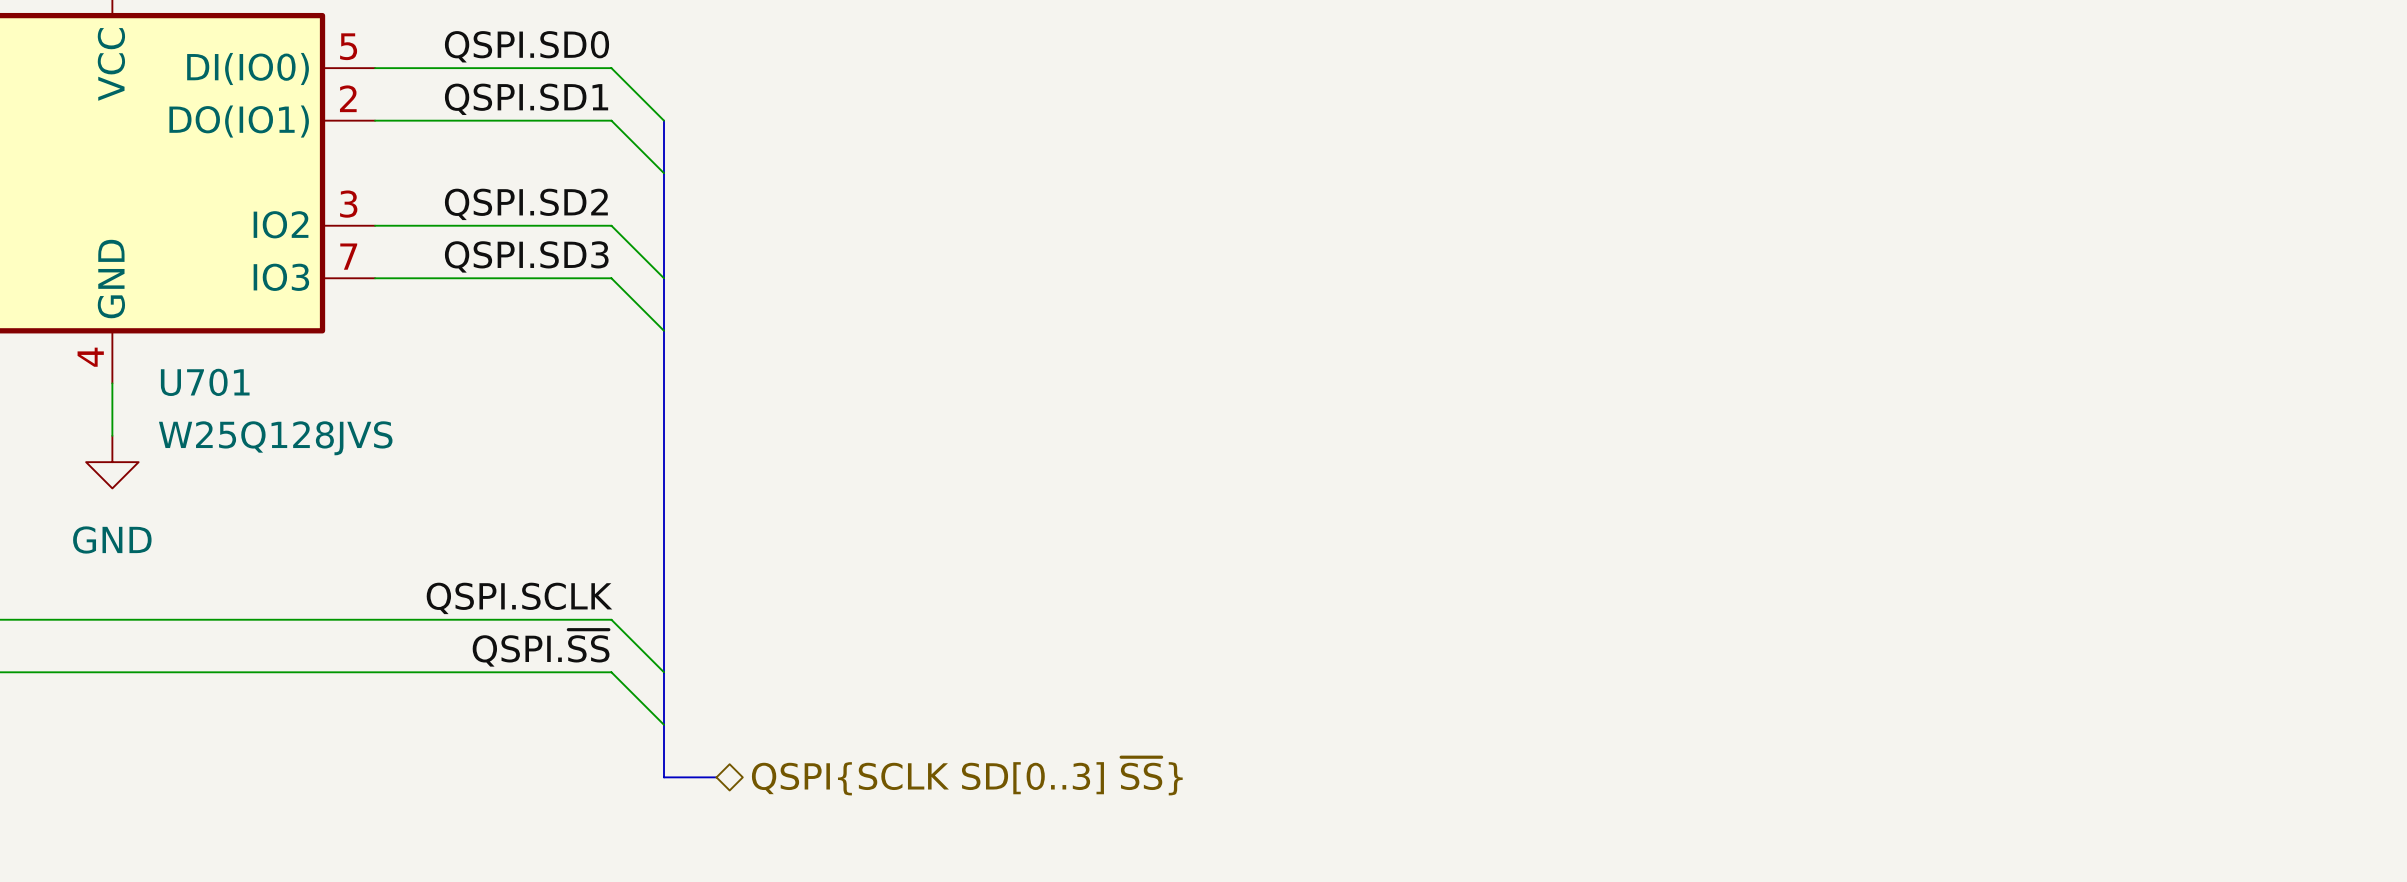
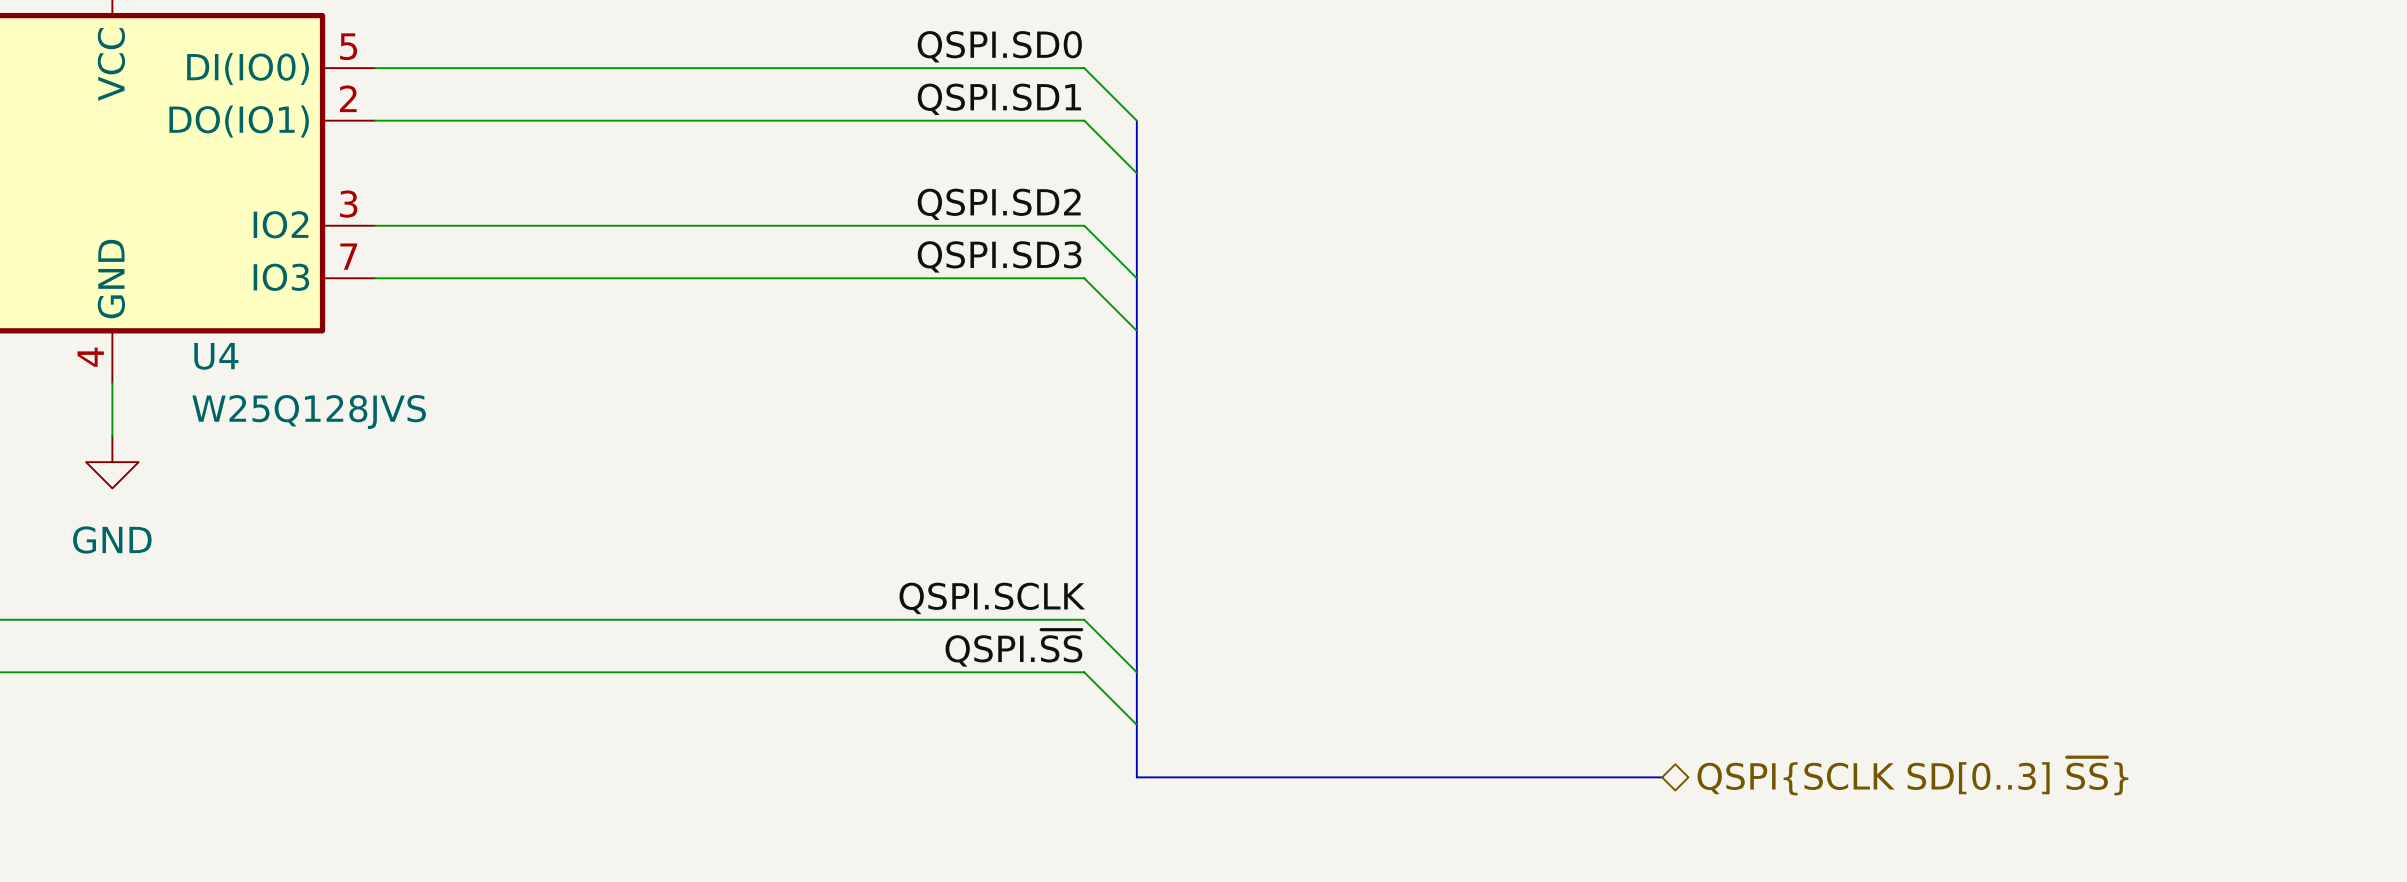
label position: QSPI.SD0 (526, 46) -> QSPI.SD0 (999, 46)
wire: (611, 68) (664, 120) -> (611, 68) (1084, 68) (1136, 120)
label position: QSPI.SD1 (526, 99) -> QSPI.SD1 (999, 99)
wire: (611, 120) (664, 173) -> (611, 120) (1084, 120) (1136, 173)
bus: (664, 120) (664, 777) (716, 777) -> none
bus: none -> (1136, 120) (1136, 777) (1662, 777)
label position: QSPI.SD2 (526, 204) -> QSPI.SD2 (999, 204)
wire: (611, 225) (664, 278) -> (611, 225) (1084, 225) (1136, 278)
label position: QSPI.SD3 (526, 256) -> QSPI.SD3 (999, 256)
wire: (611, 278) (664, 330) -> (611, 278) (1084, 278) (1136, 330)
U701 name: U701 (205, 382) -> U4 (216, 356)
U701 value position: W25Q128JVS (275, 438) -> W25Q128JVS (309, 412)
label position: QSPI.SCLK (519, 598) -> QSPI.SCLK (992, 598)
wire: (611, 619) (664, 672) -> (611, 619) (1084, 619) (1136, 672)
label position: QSPI.~{SS} (541, 648) -> QSPI.~{SS} (1013, 648)
wire: (611, 672) (664, 724) -> (611, 672) (1084, 672) (1136, 724)
hierarchical label: QSPI{SCLK SD[0..3] ~{SS}} (967, 776) -> none
hierarchical label: none -> QSPI{SCLK SD[0..3] ~{SS}} (1912, 776)

